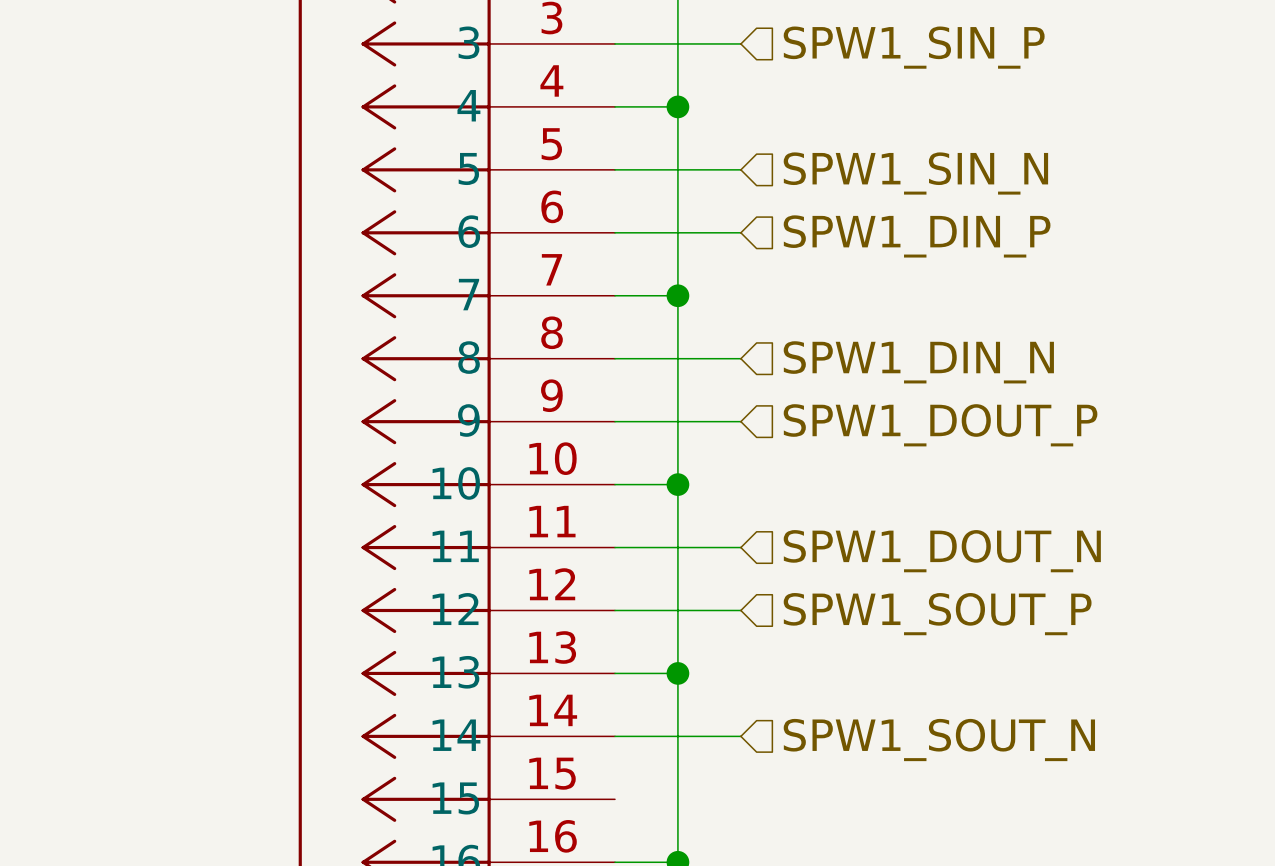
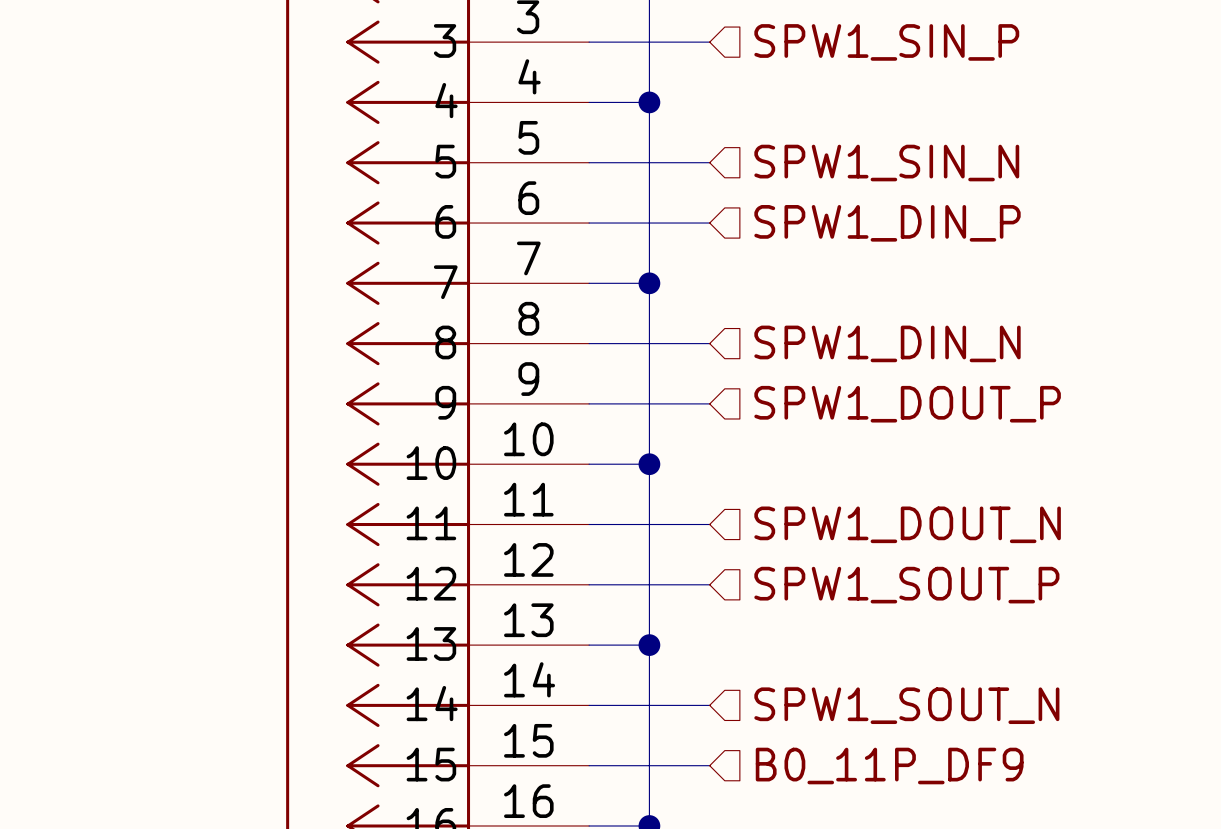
wire: none -> (589, 765) (709, 765)
hierarchical label: none -> B0_11P_DF9 (889, 766)

